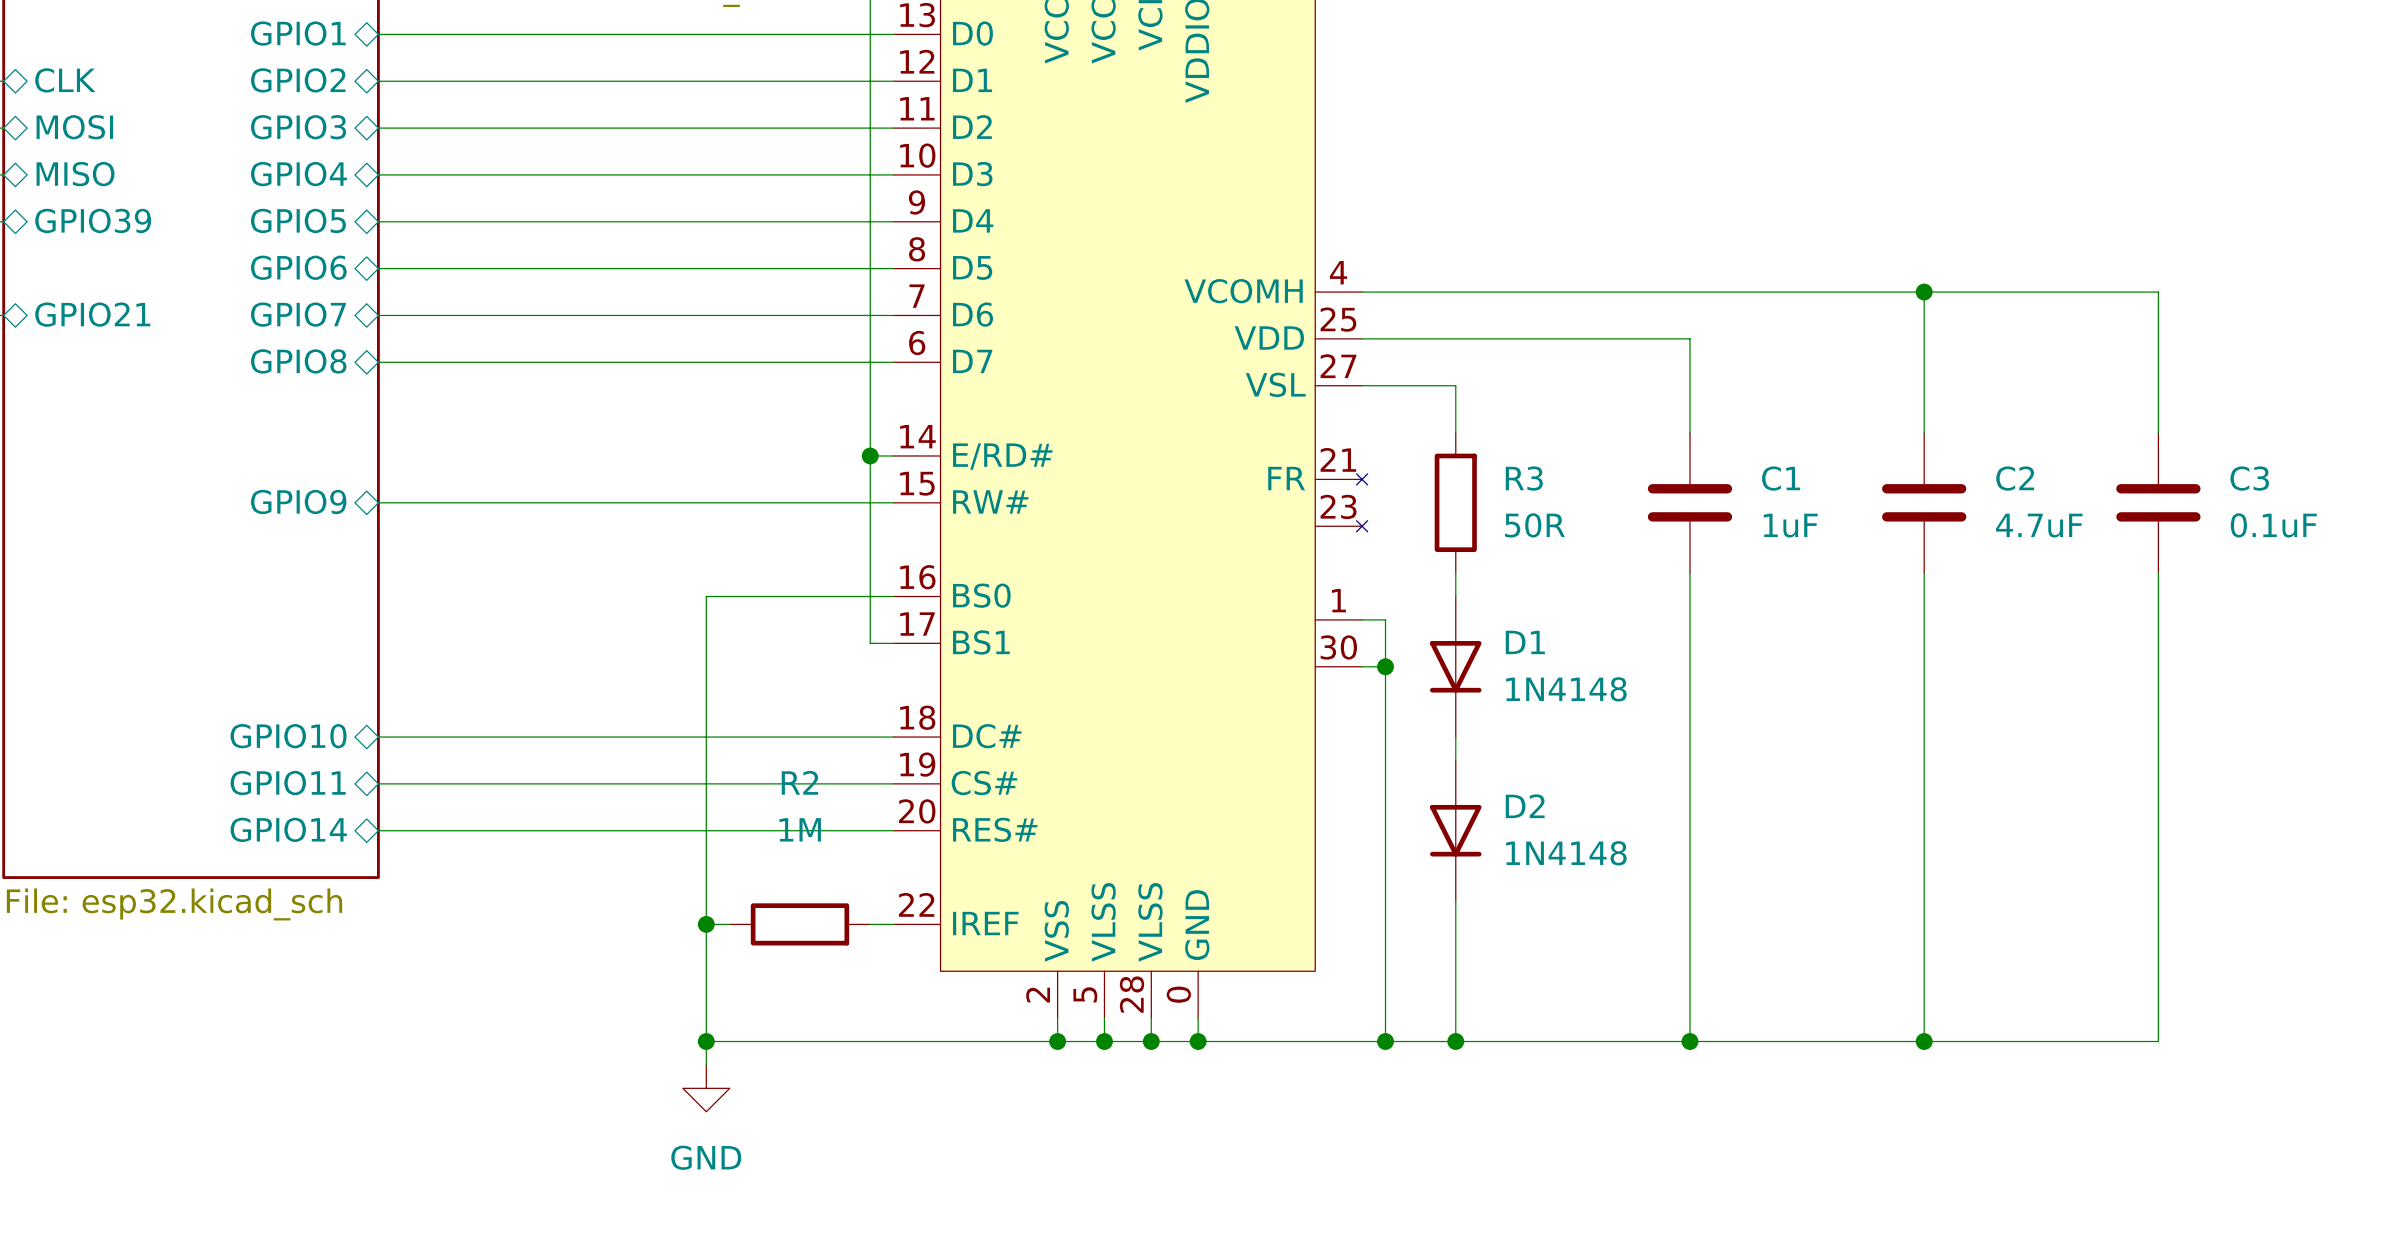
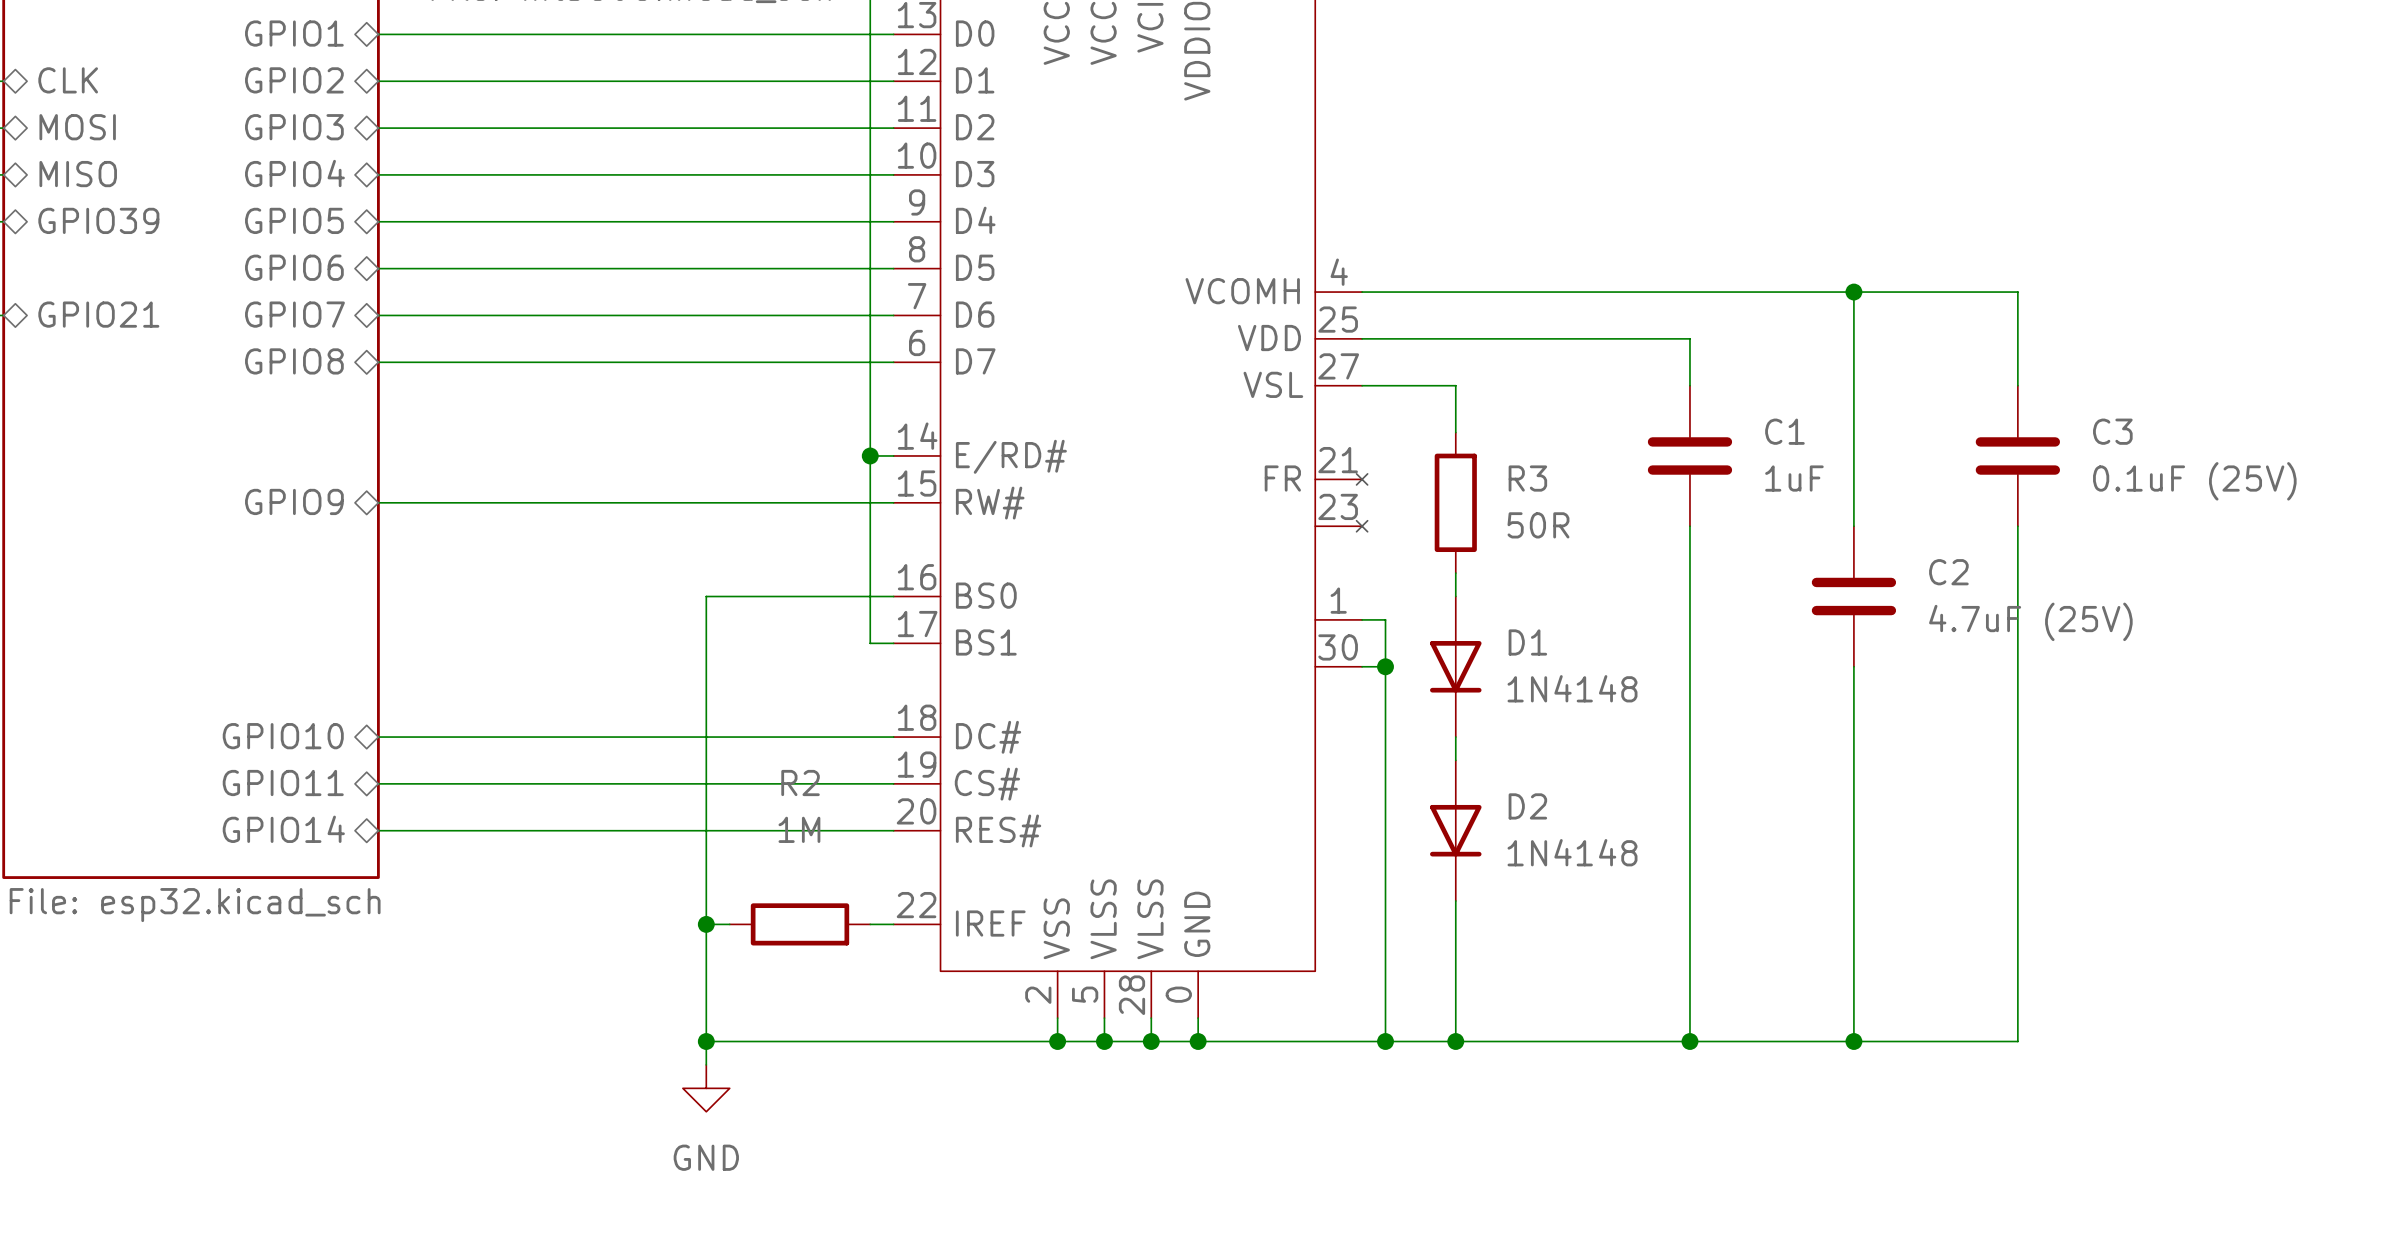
wire: none -> (1853, 292) (1853, 526)
wire: (1924, 292) (1924, 432) -> none
junction position: (1924, 292) -> (1853, 292)
wire: (2017, 292) (2158, 292) (2158, 432) -> (2017, 292) (2017, 385)
C1 position: (1689, 502) -> (1689, 455)
C2 position: (1924, 502) -> (1853, 596)
C3 position: (2158, 502) -> (2017, 455)
C2 value: 4.7uF (2039, 525) -> 4.7uF (25V) (2030, 621)
C3 value: 0.1uF (2273, 525) -> 0.1uF (25V) (2194, 481)
wire: (1924, 573) (1924, 1041) -> none
wire: (2158, 573) (2158, 1041) (2017, 1041) -> (2017, 526) (2017, 1041)
wire: none -> (1853, 666) (1853, 1041)
junction position: (1924, 1041) -> (1853, 1041)

